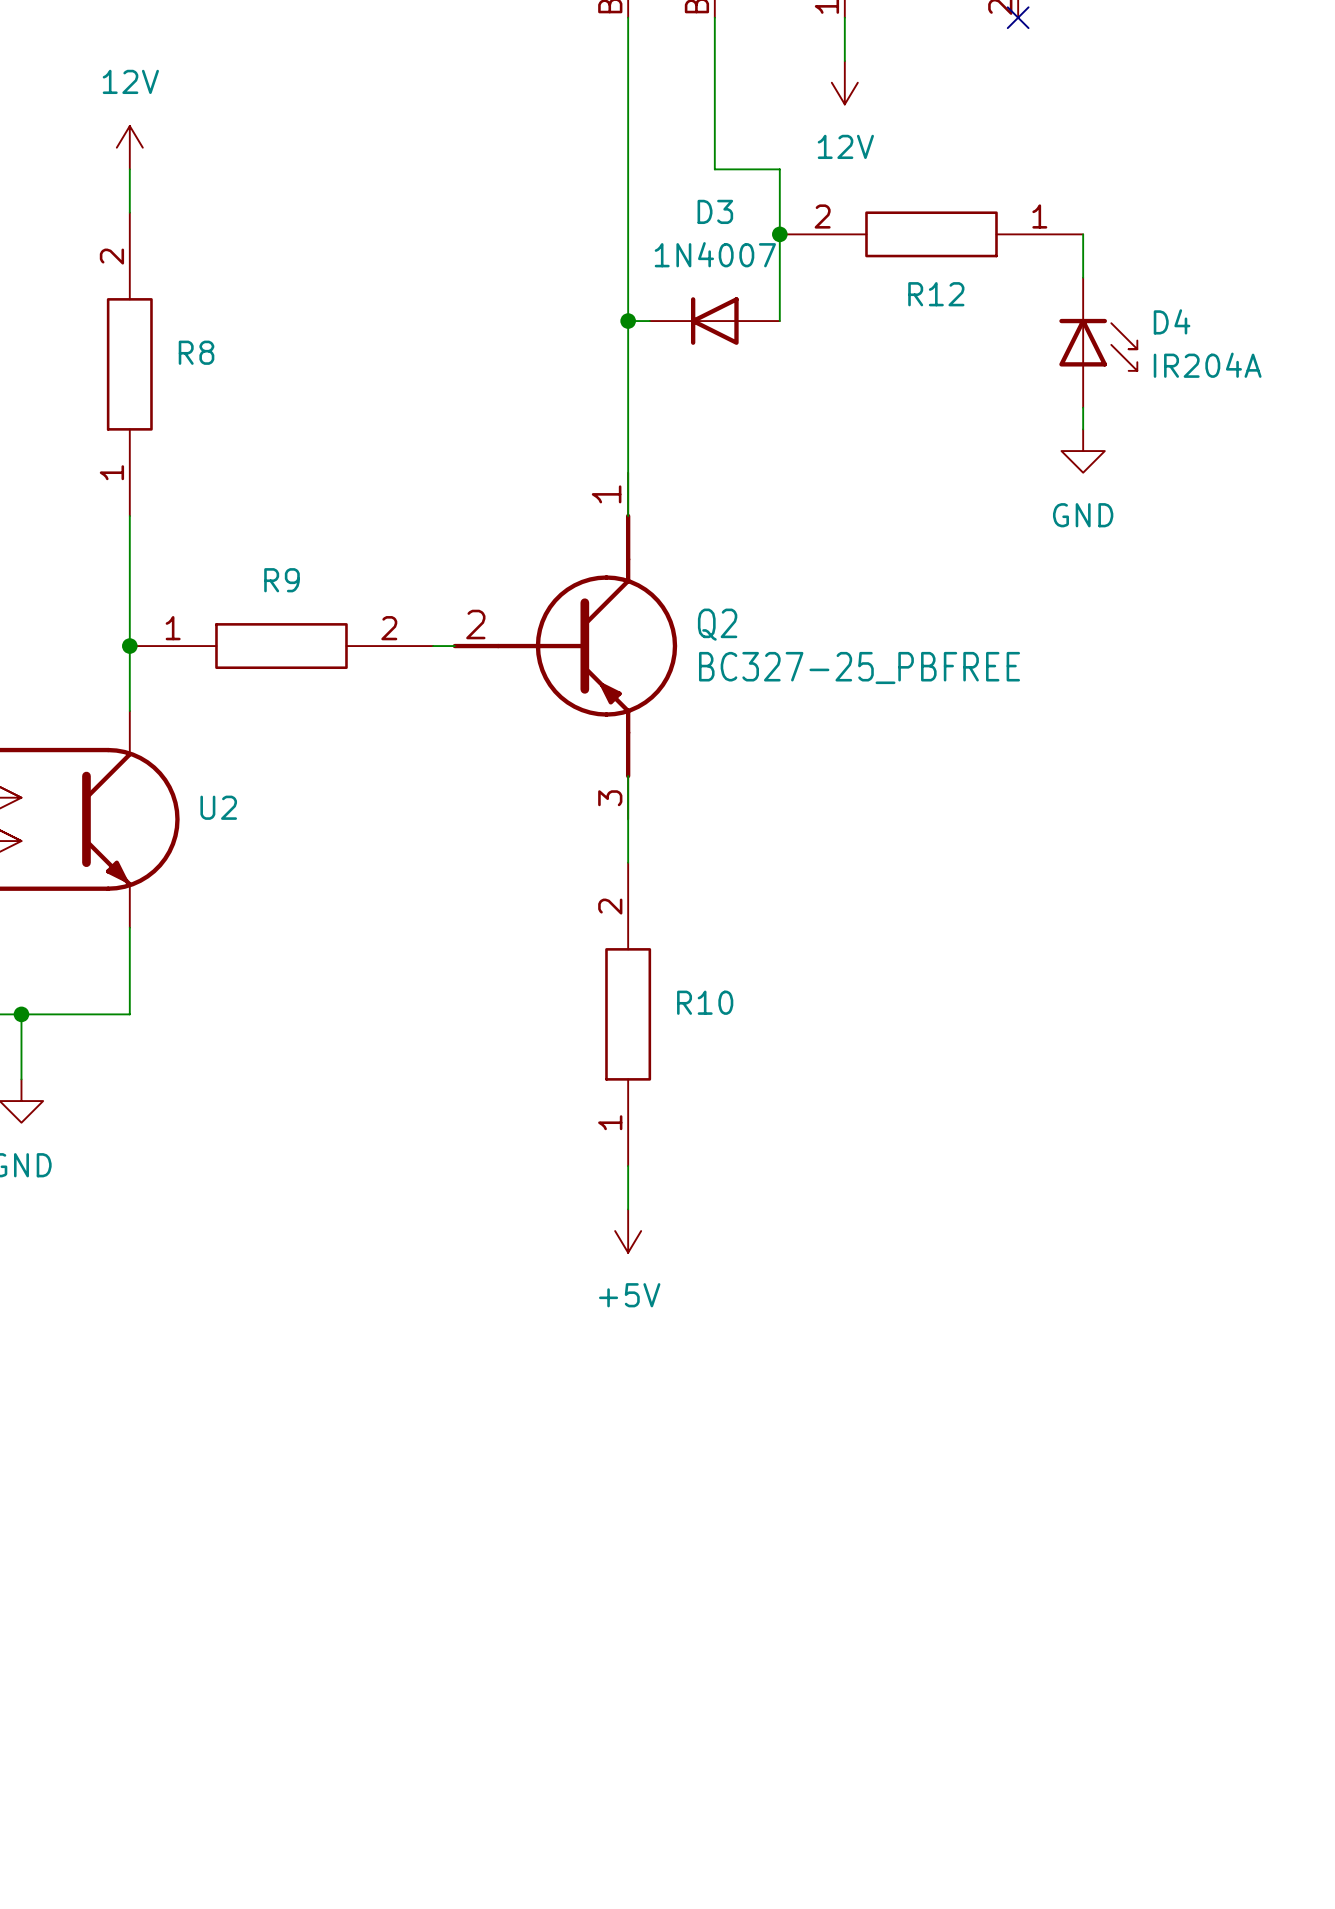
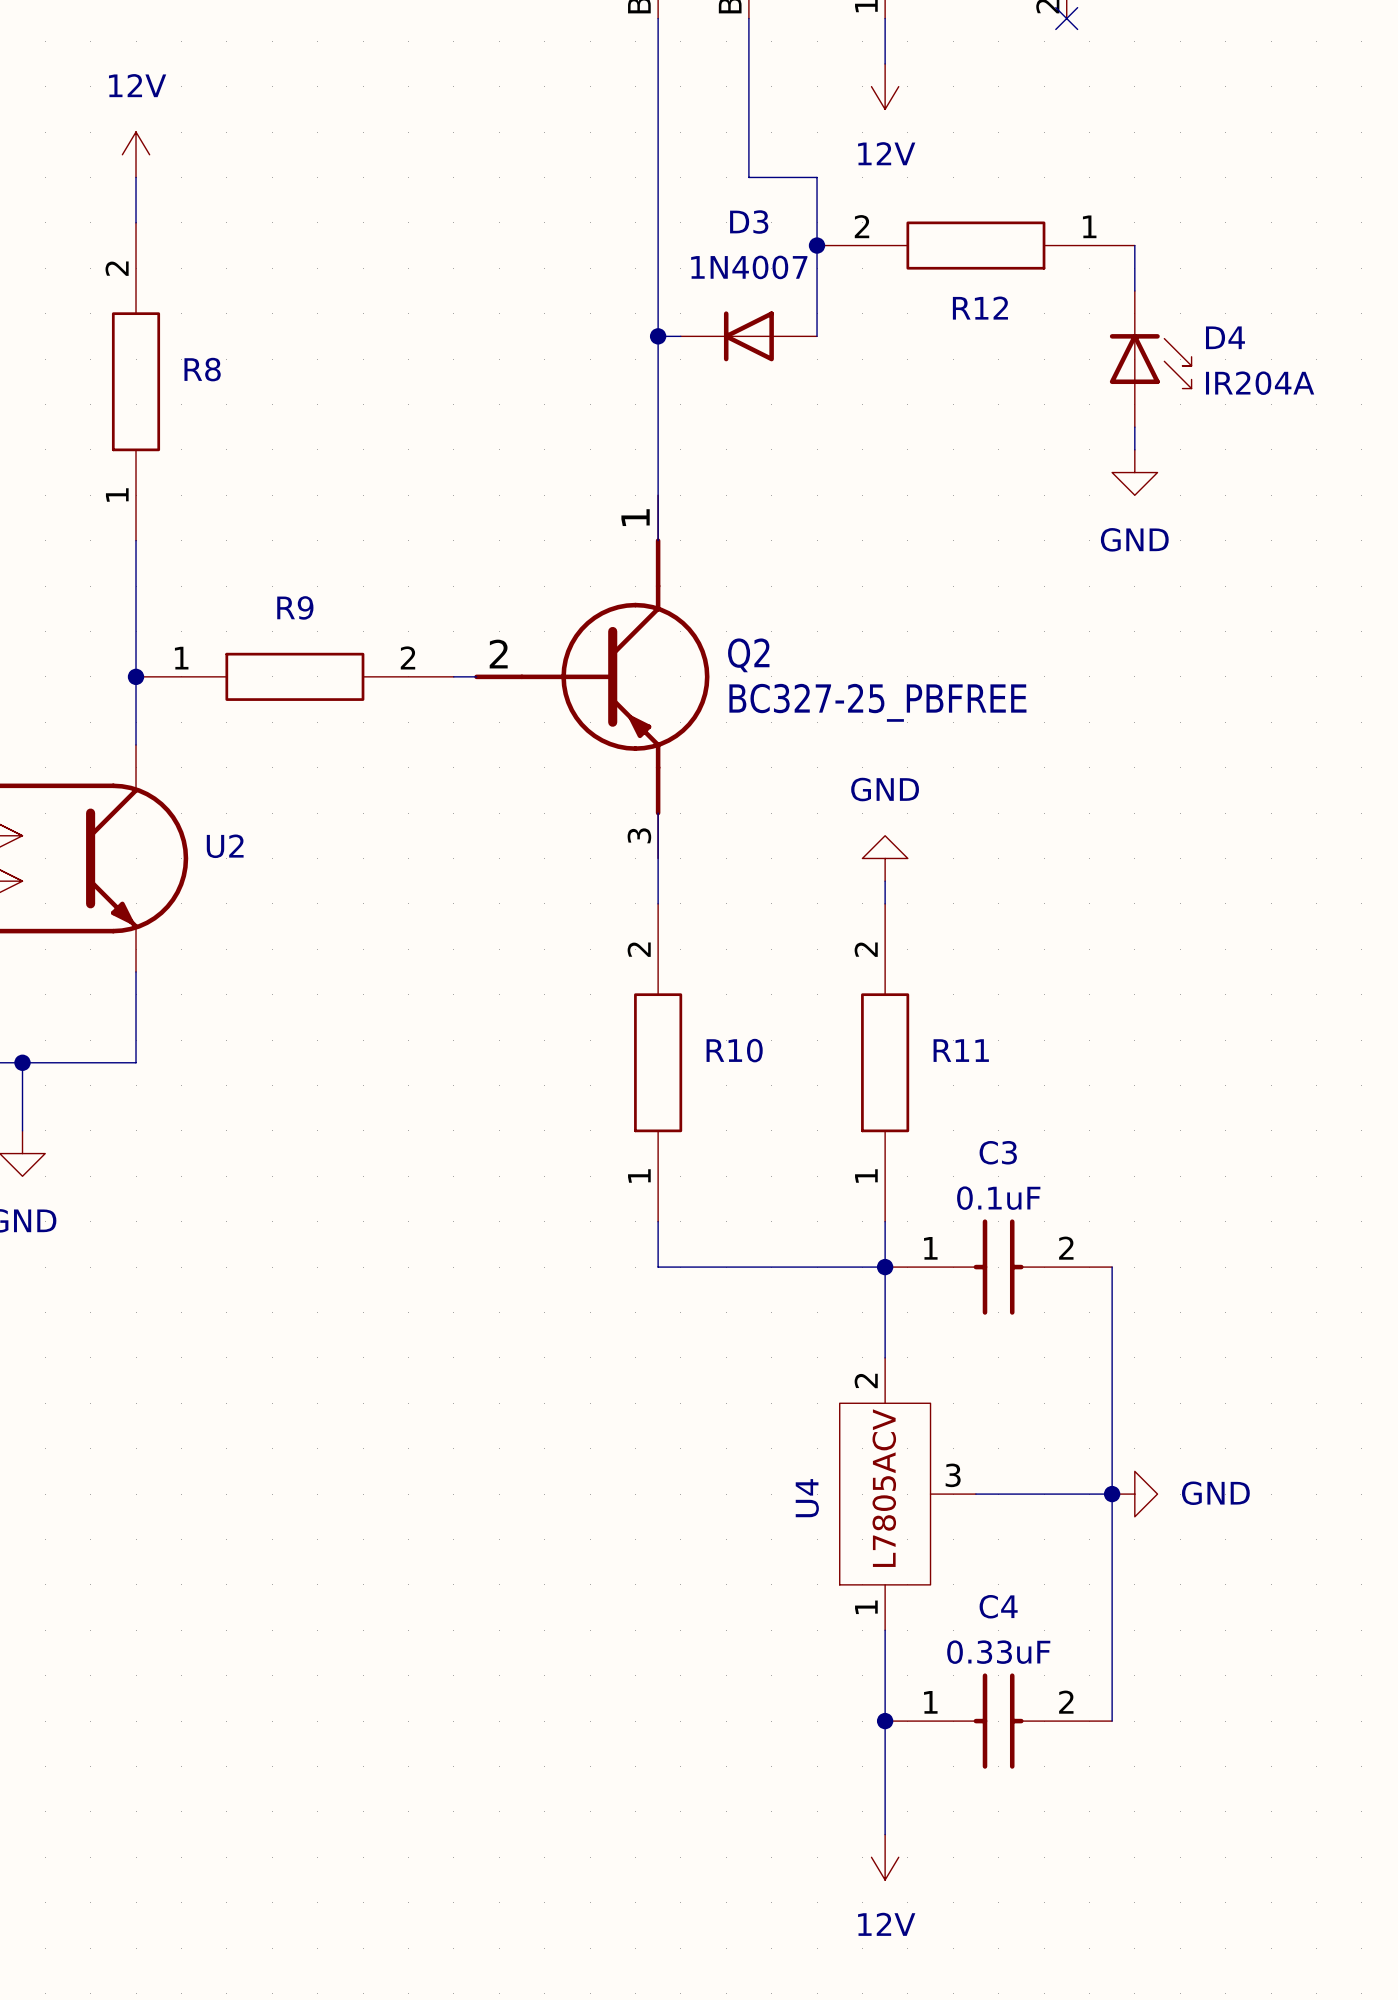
power symbol: none -> GND (885, 858)
wire: none -> (885, 881) (885, 903)
R11: none -> (885, 1062)
wire: none -> (885, 1221) (885, 1357)
wire: none -> (658, 1267) (885, 1267)
junction: none -> (885, 1267)
C3: none -> 0.1uF (998, 1267)
wire: none -> (1112, 1267) (1112, 1721)
power symbol: +5V (628, 1231) -> none
U4: none -> (907, 1494)
wire: none -> (975, 1494) (1112, 1494)
junction: none -> (1112, 1494)
power symbol: none -> GND (1134, 1494)
wire: none -> (885, 1630) (885, 1834)
junction: none -> (885, 1721)
C4: none -> 0.33uF (998, 1721)
power symbol: none -> 12V (885, 1857)

